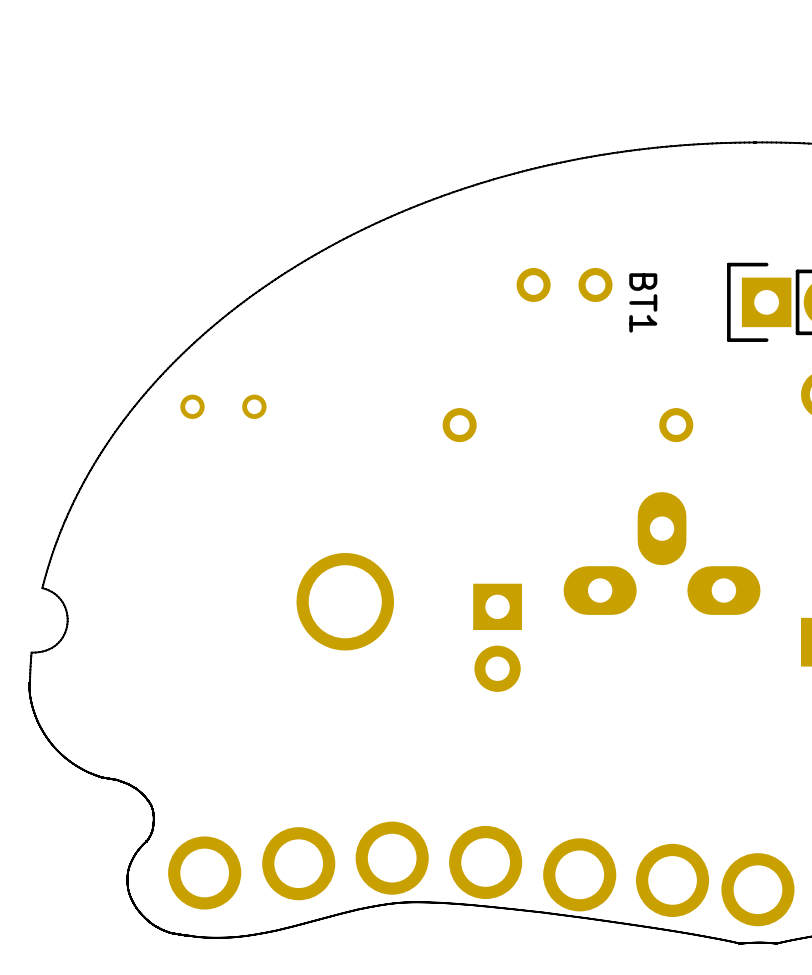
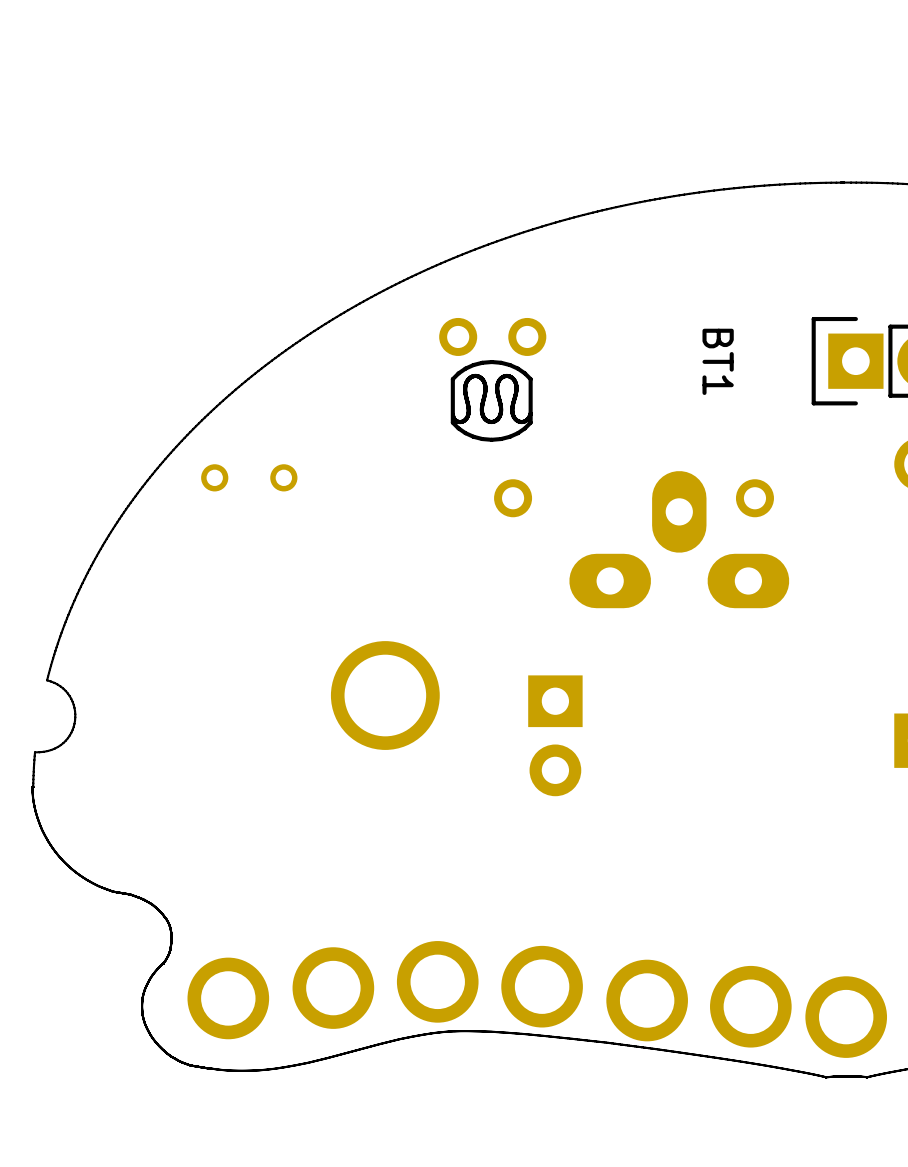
part position: (564, 284) -> (492, 336)
drawing: none -> [450, 359, 533, 442]
part position: (662, 553) -> (679, 539)

